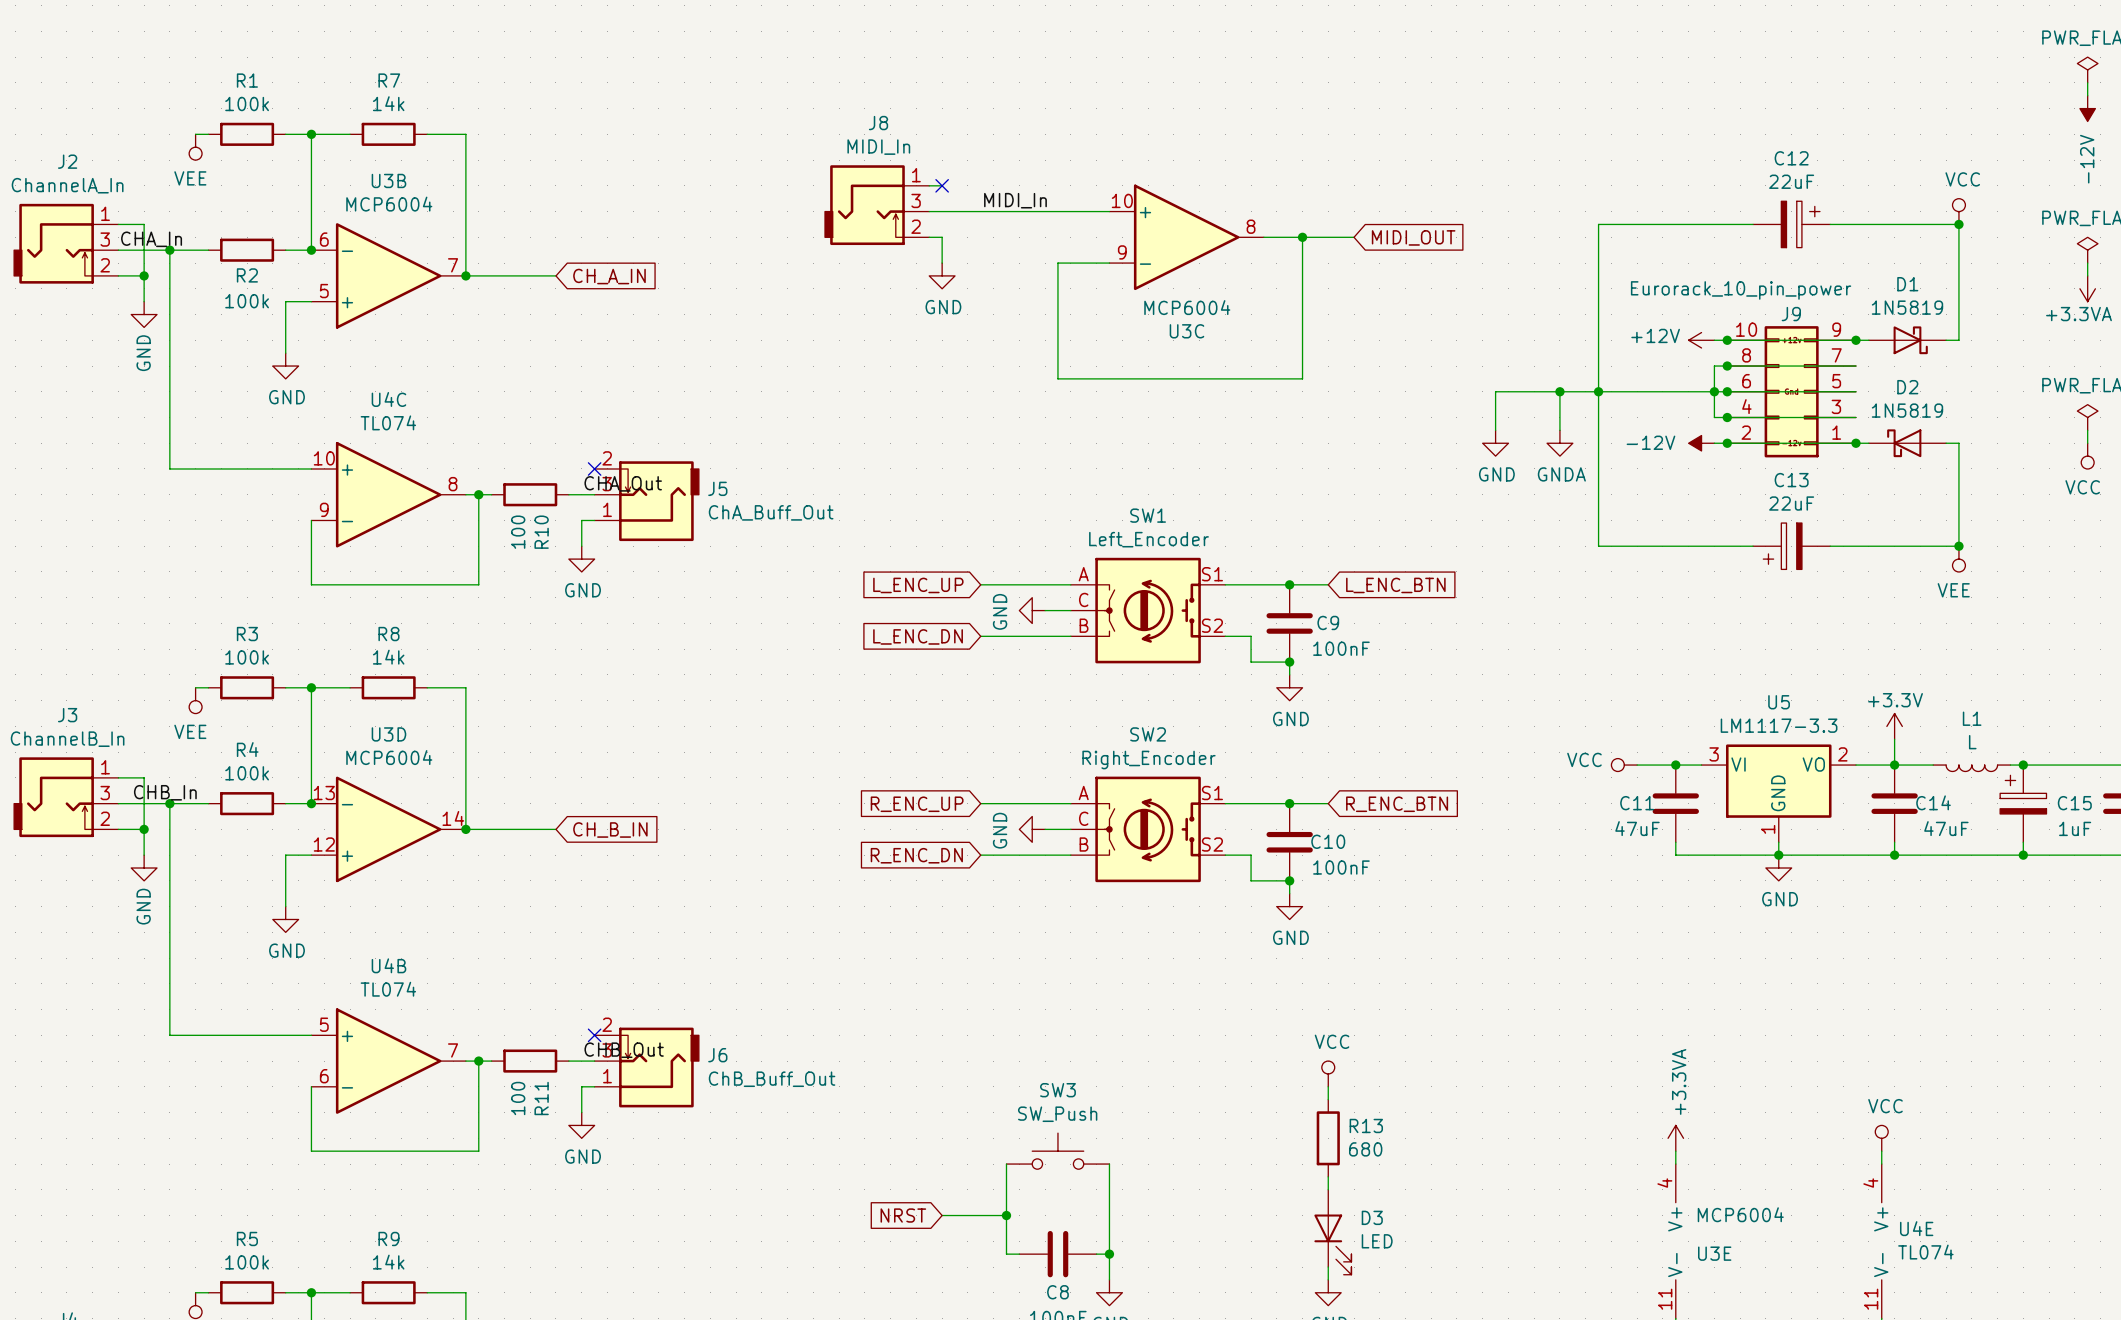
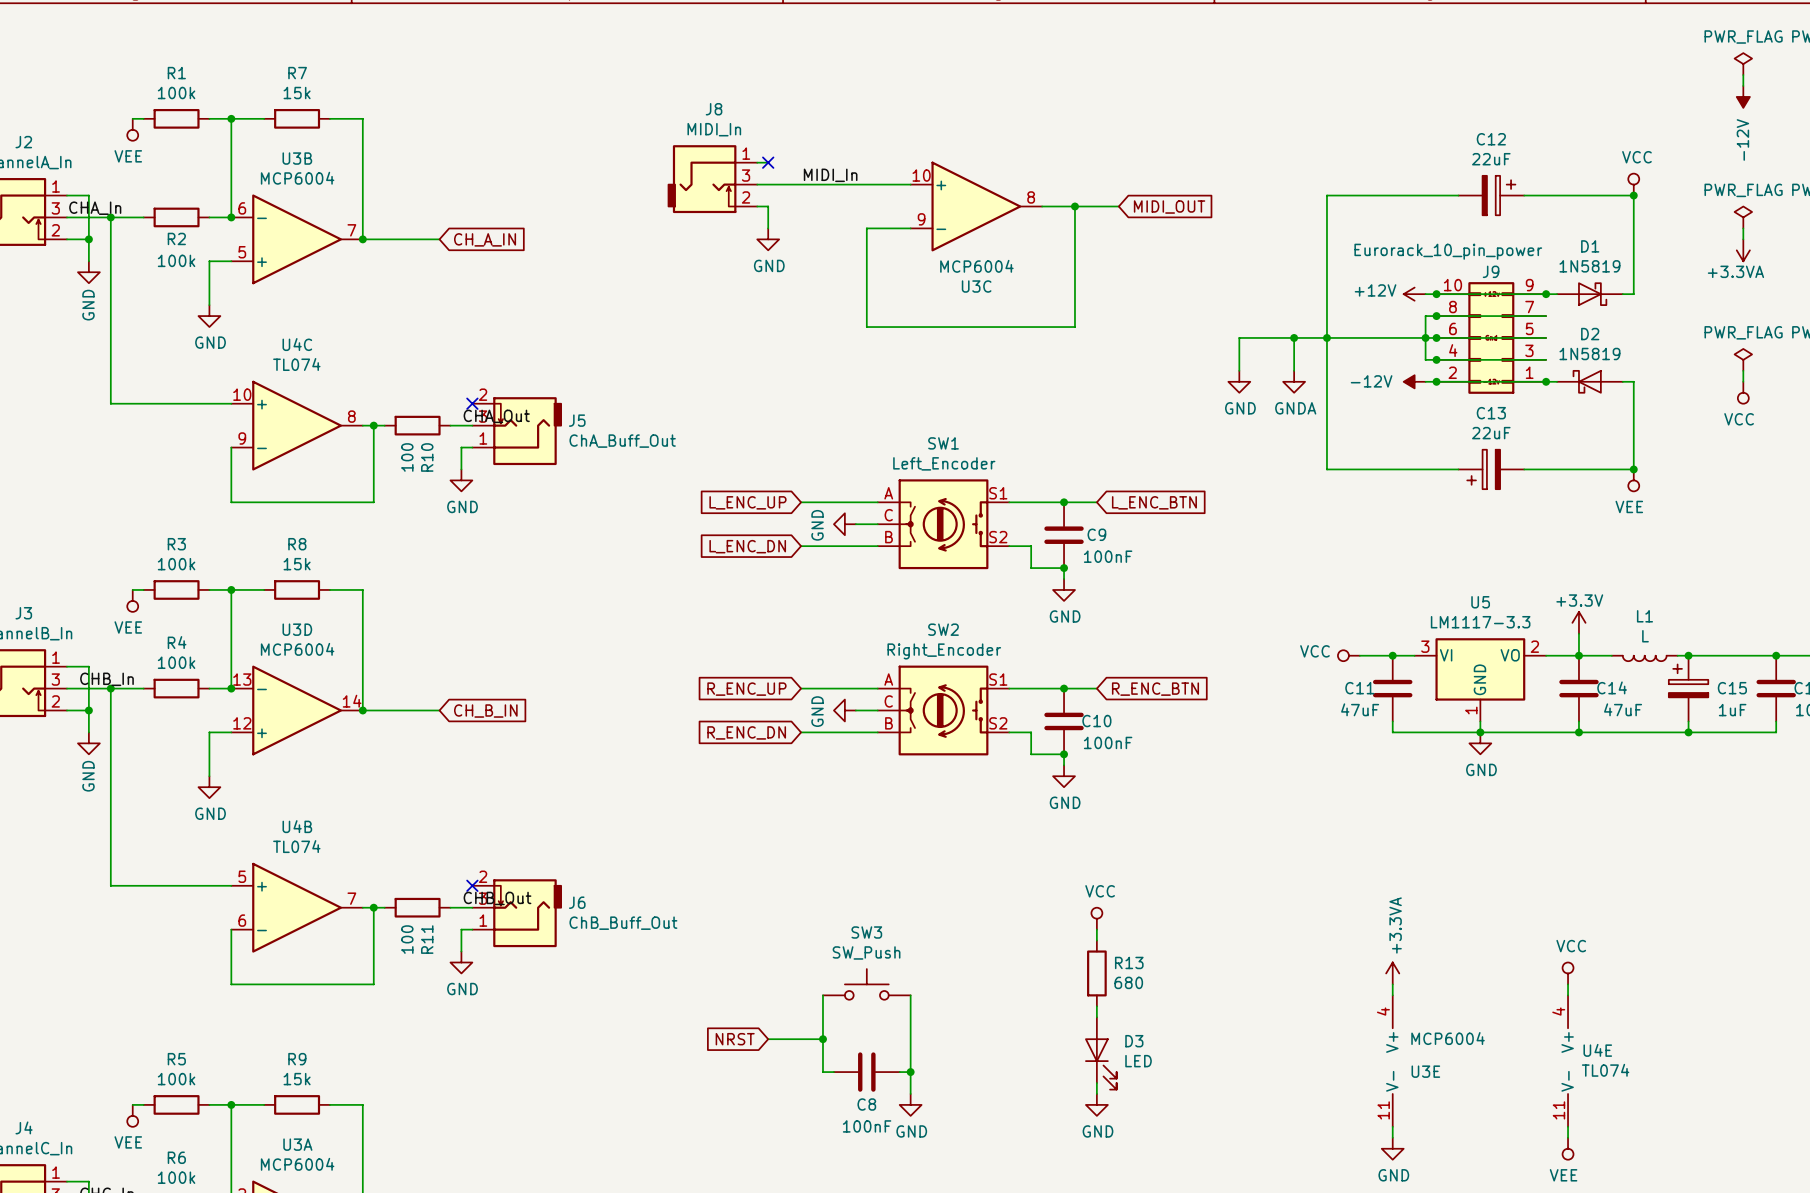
R7 value: 14k (388, 103) -> 15k (297, 93)
R8 value: 14k (388, 657) -> 15k (297, 564)
R9 value: 14k (388, 1262) -> 15k (297, 1079)

